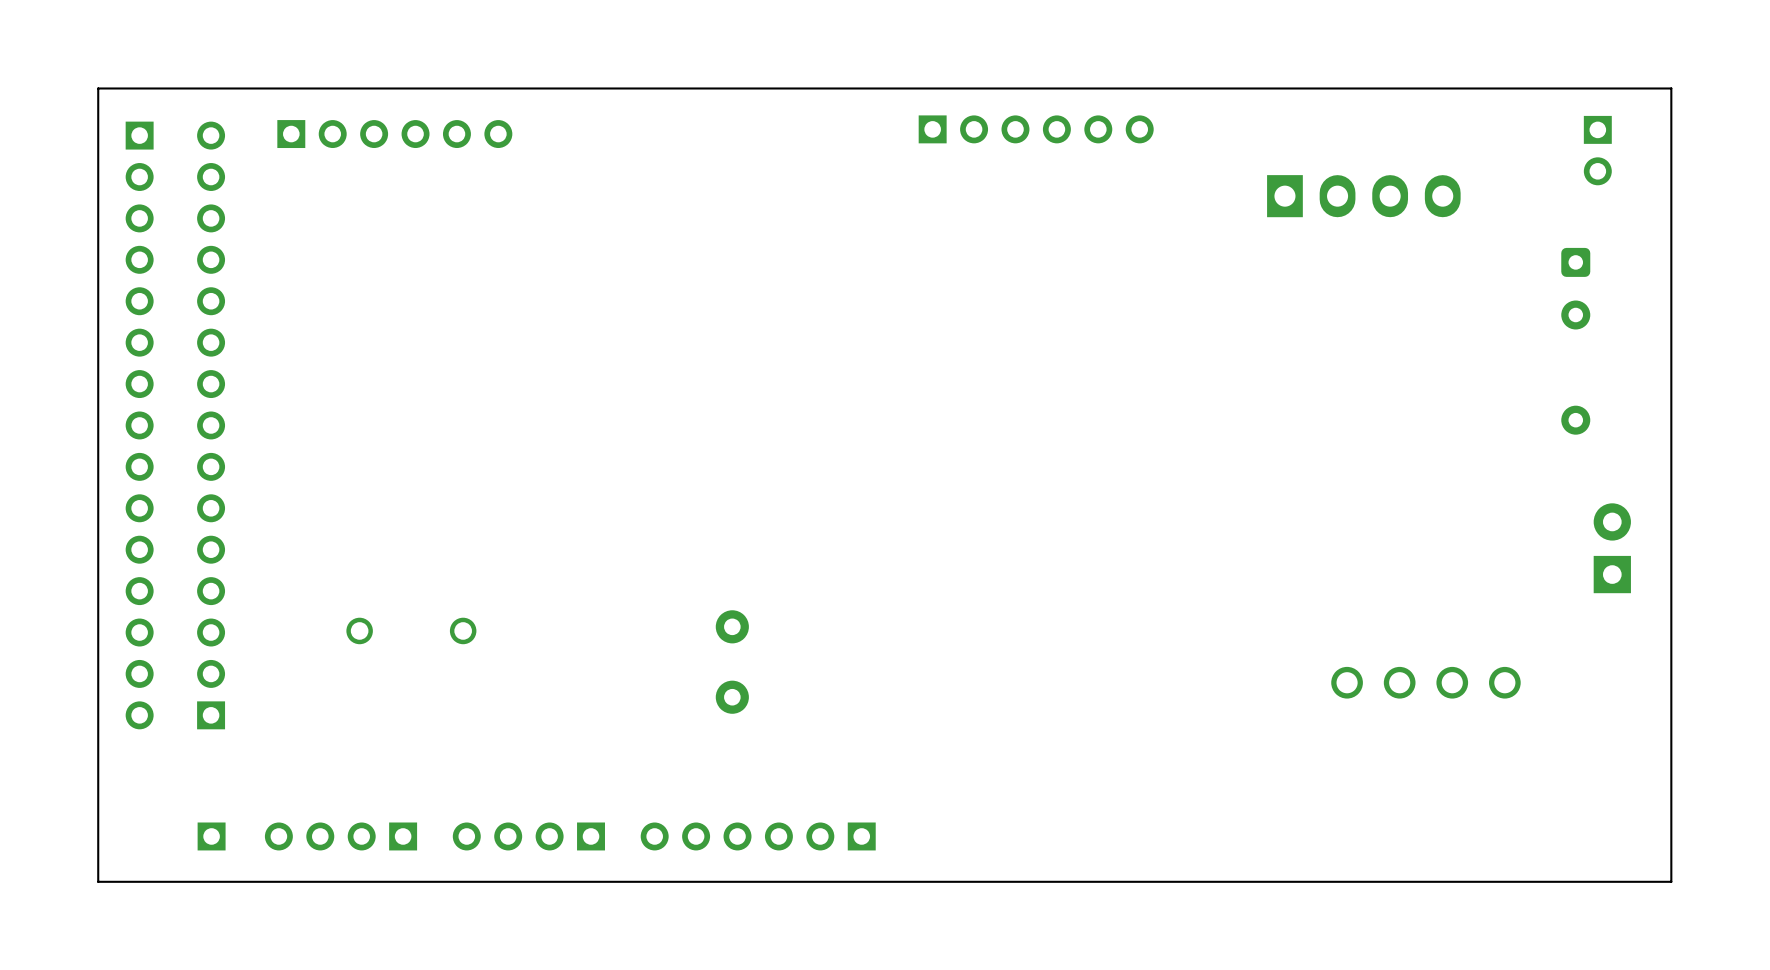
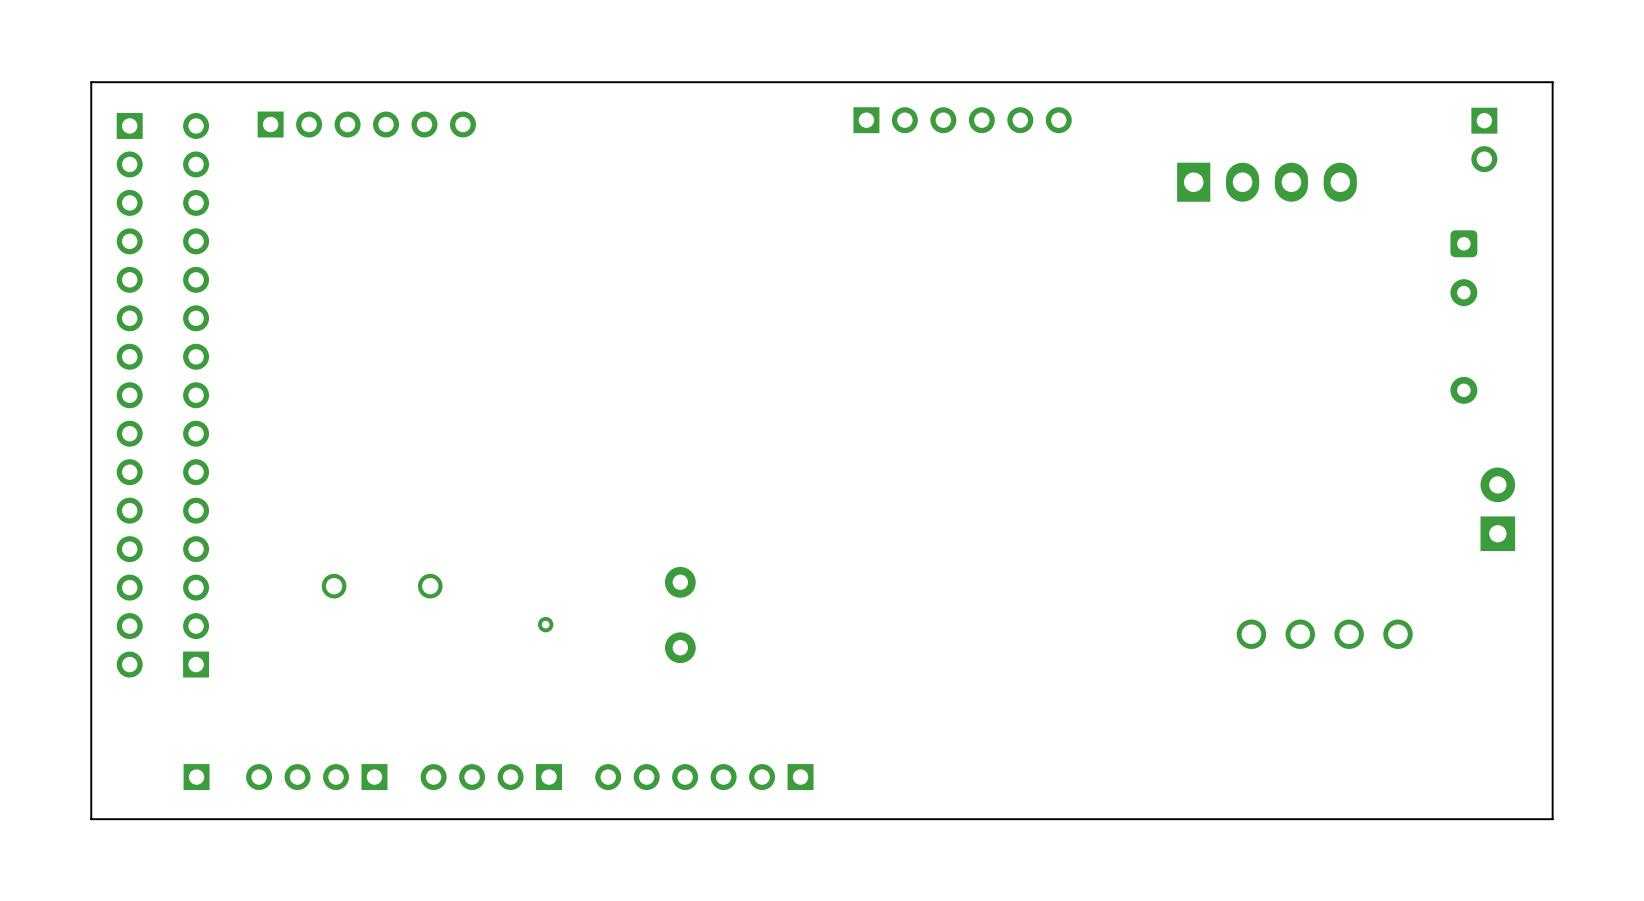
via: none -> (545, 624)

